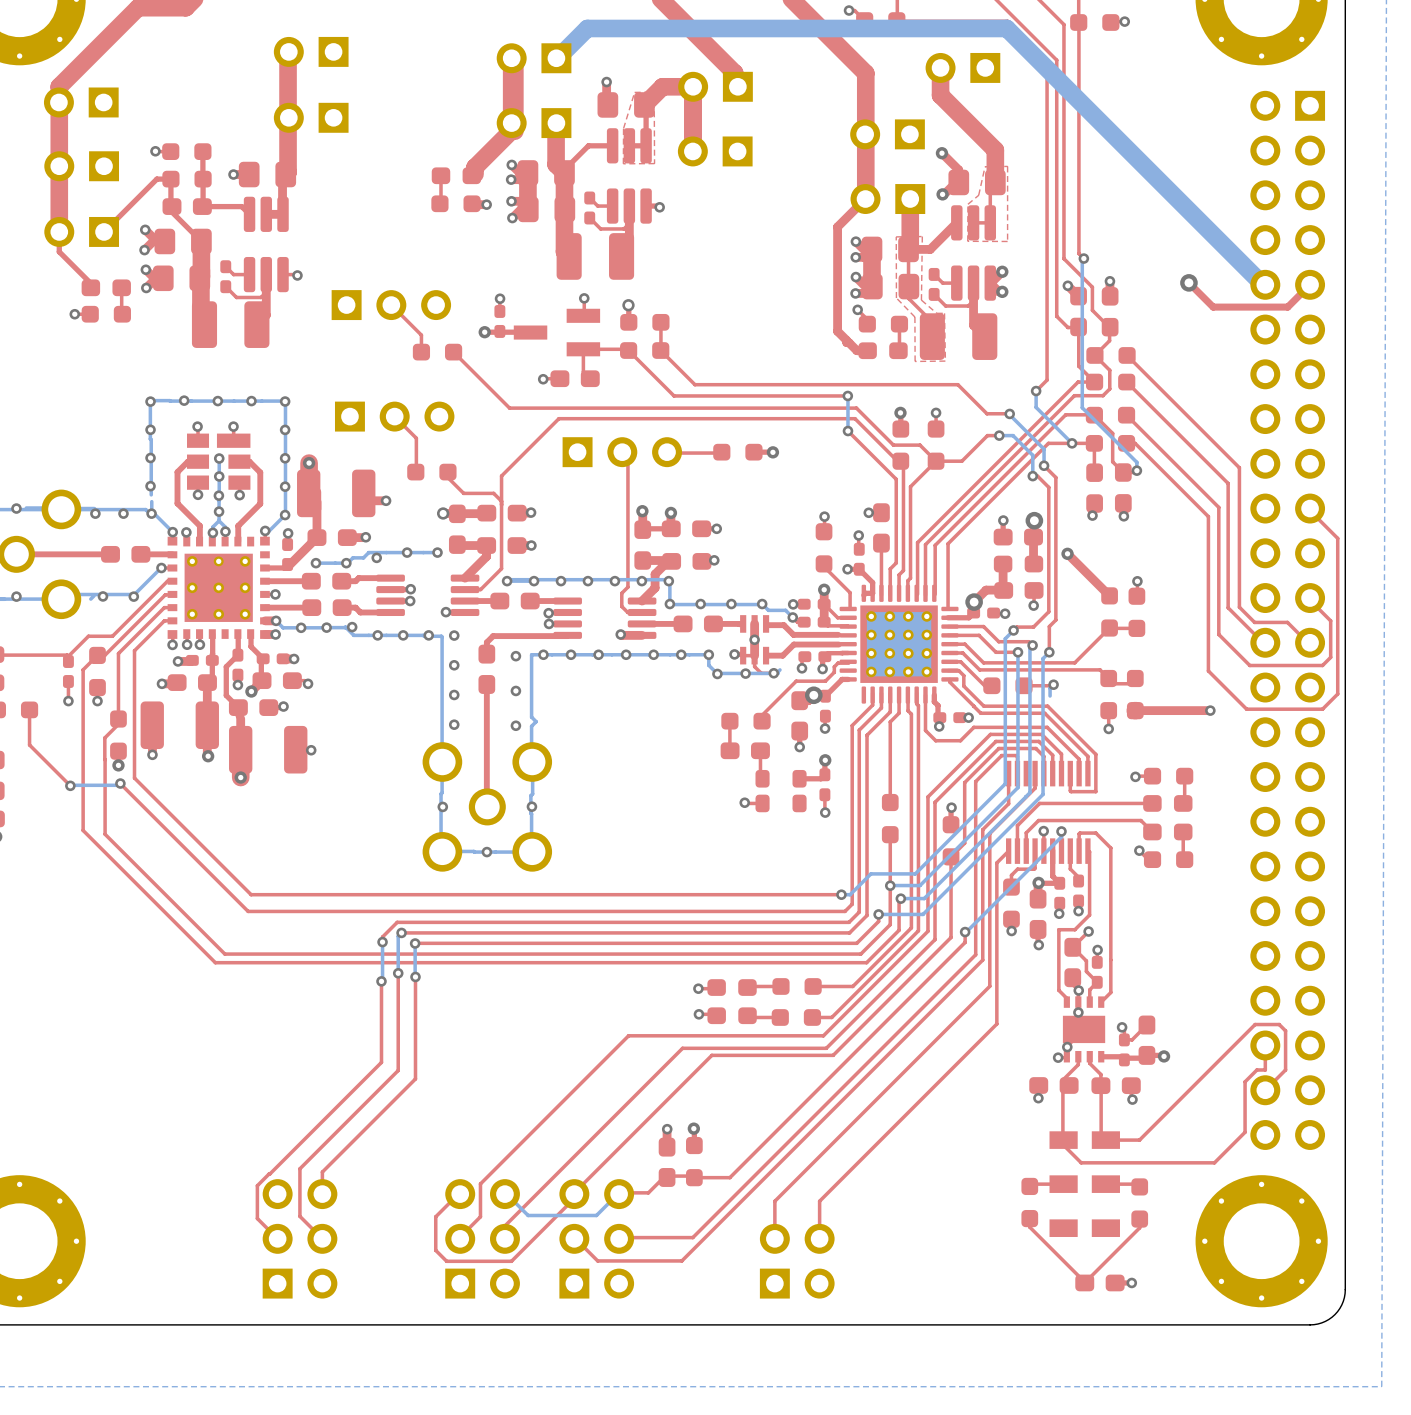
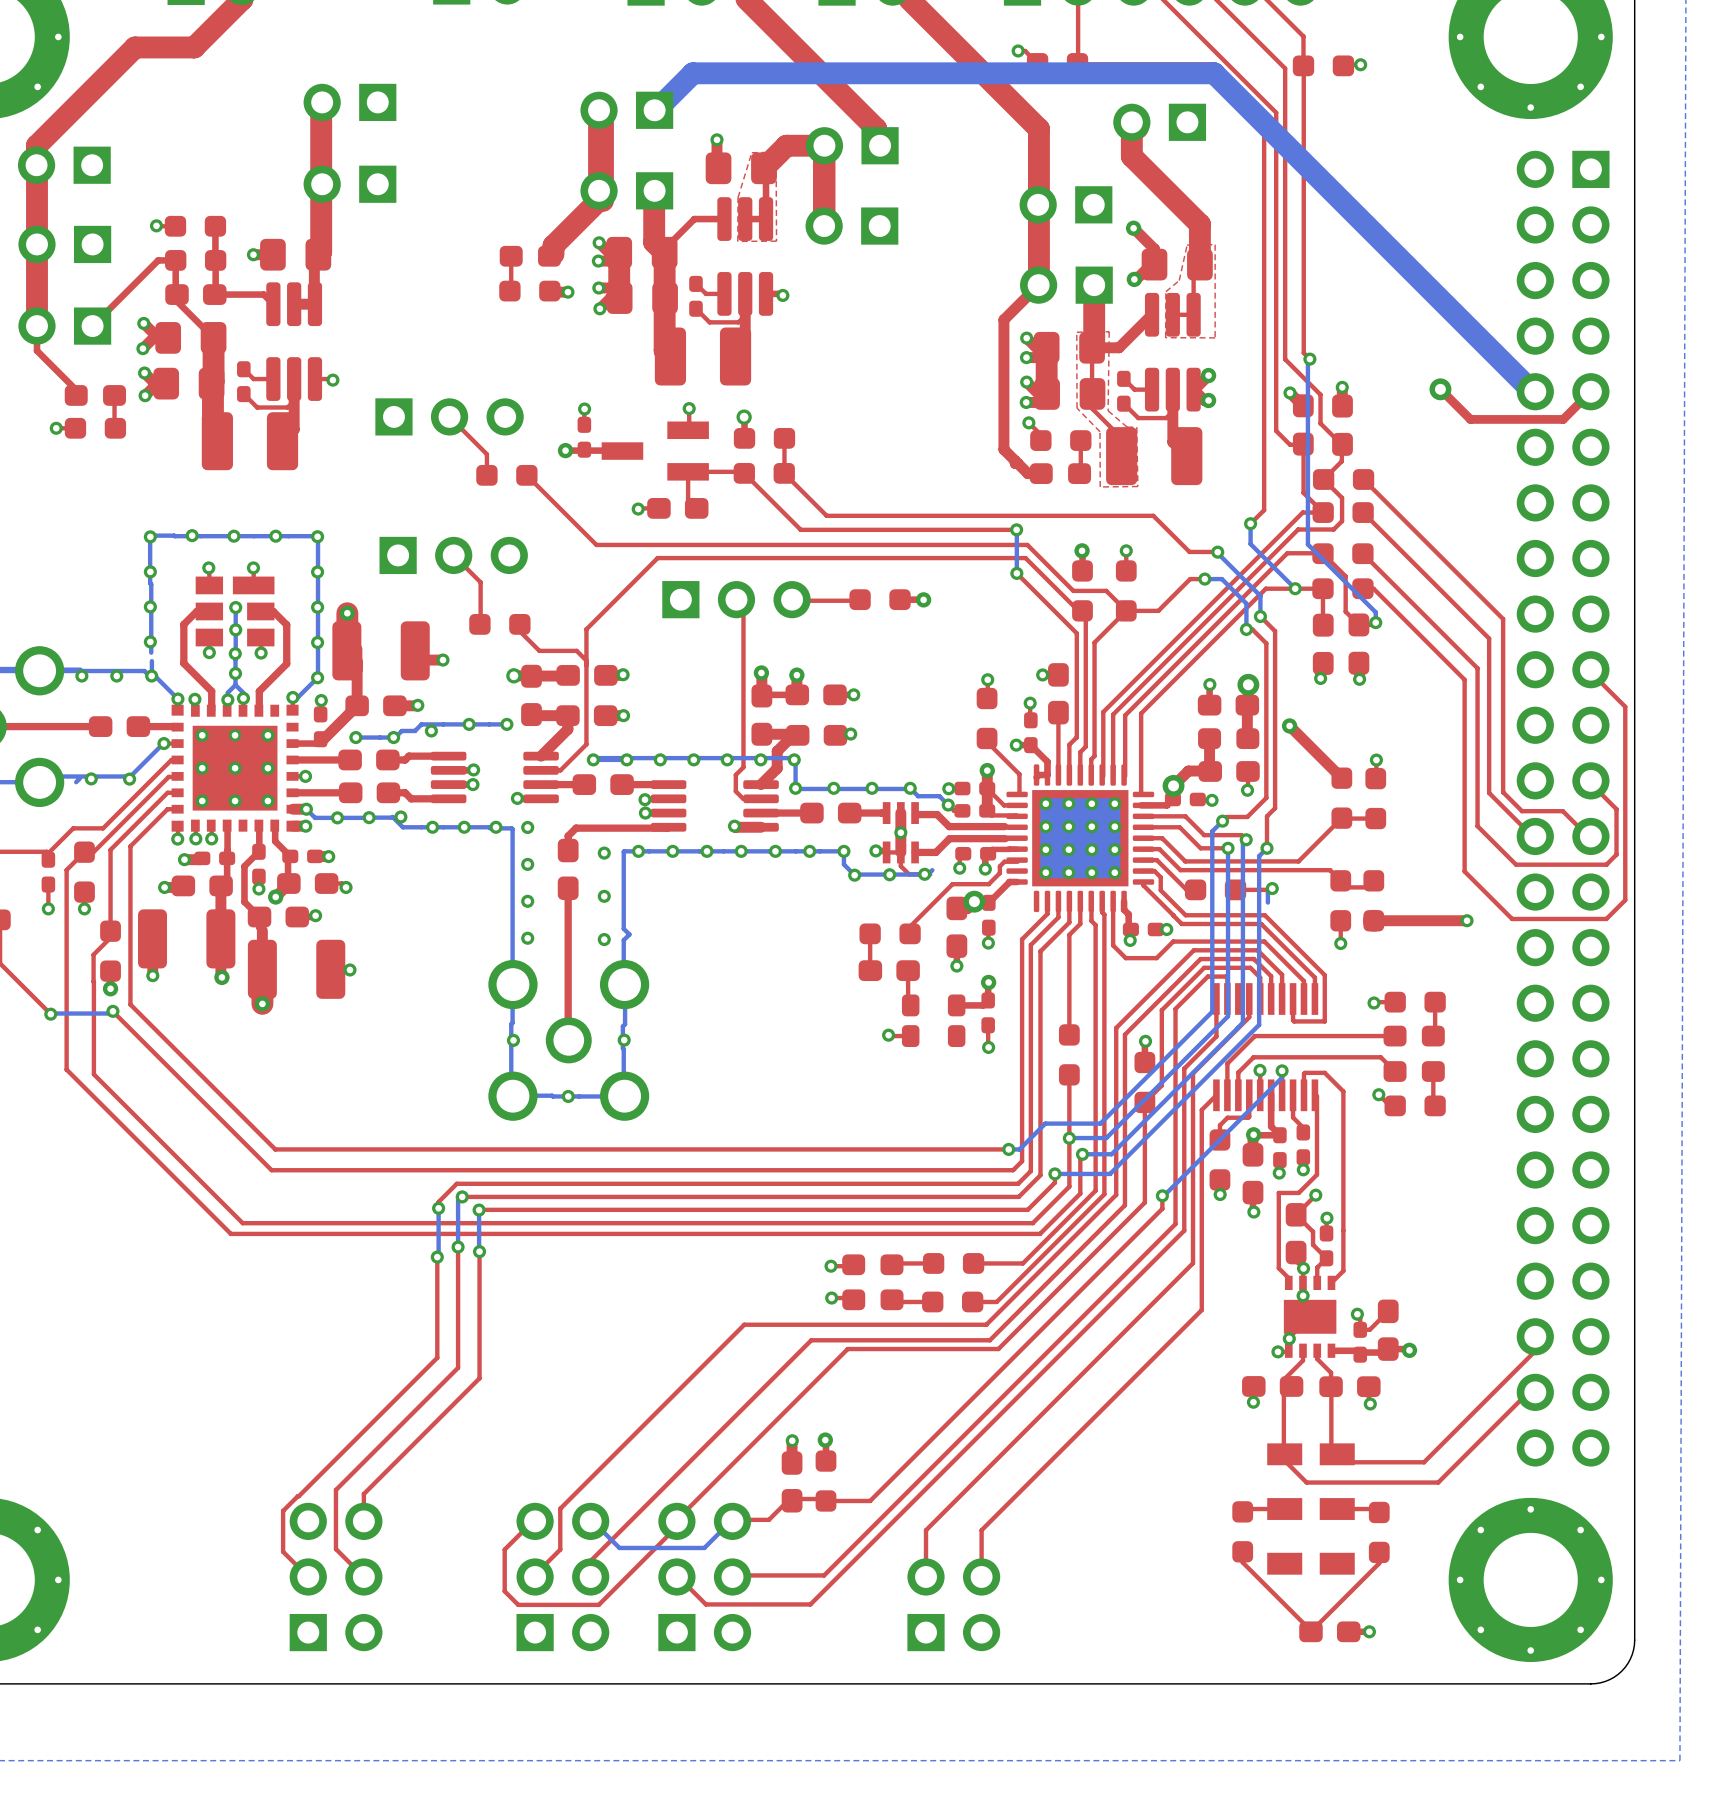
top track: (1265, 1056) (1265, 1069) (1256, 1069) (1245, 1081) (1245, 1132) (1214, 1162) (1187, 1162) -> (1535, 1392) (1528, 1392) (1438, 1482)
top track: (1265, 1090) (1285, 1069) (1285, 1030) (1279, 1024) (1255, 1024) (1139, 1140) (1101, 1140) -> (1535, 1351) (1424, 1462) (1331, 1462) (1331, 1454)

